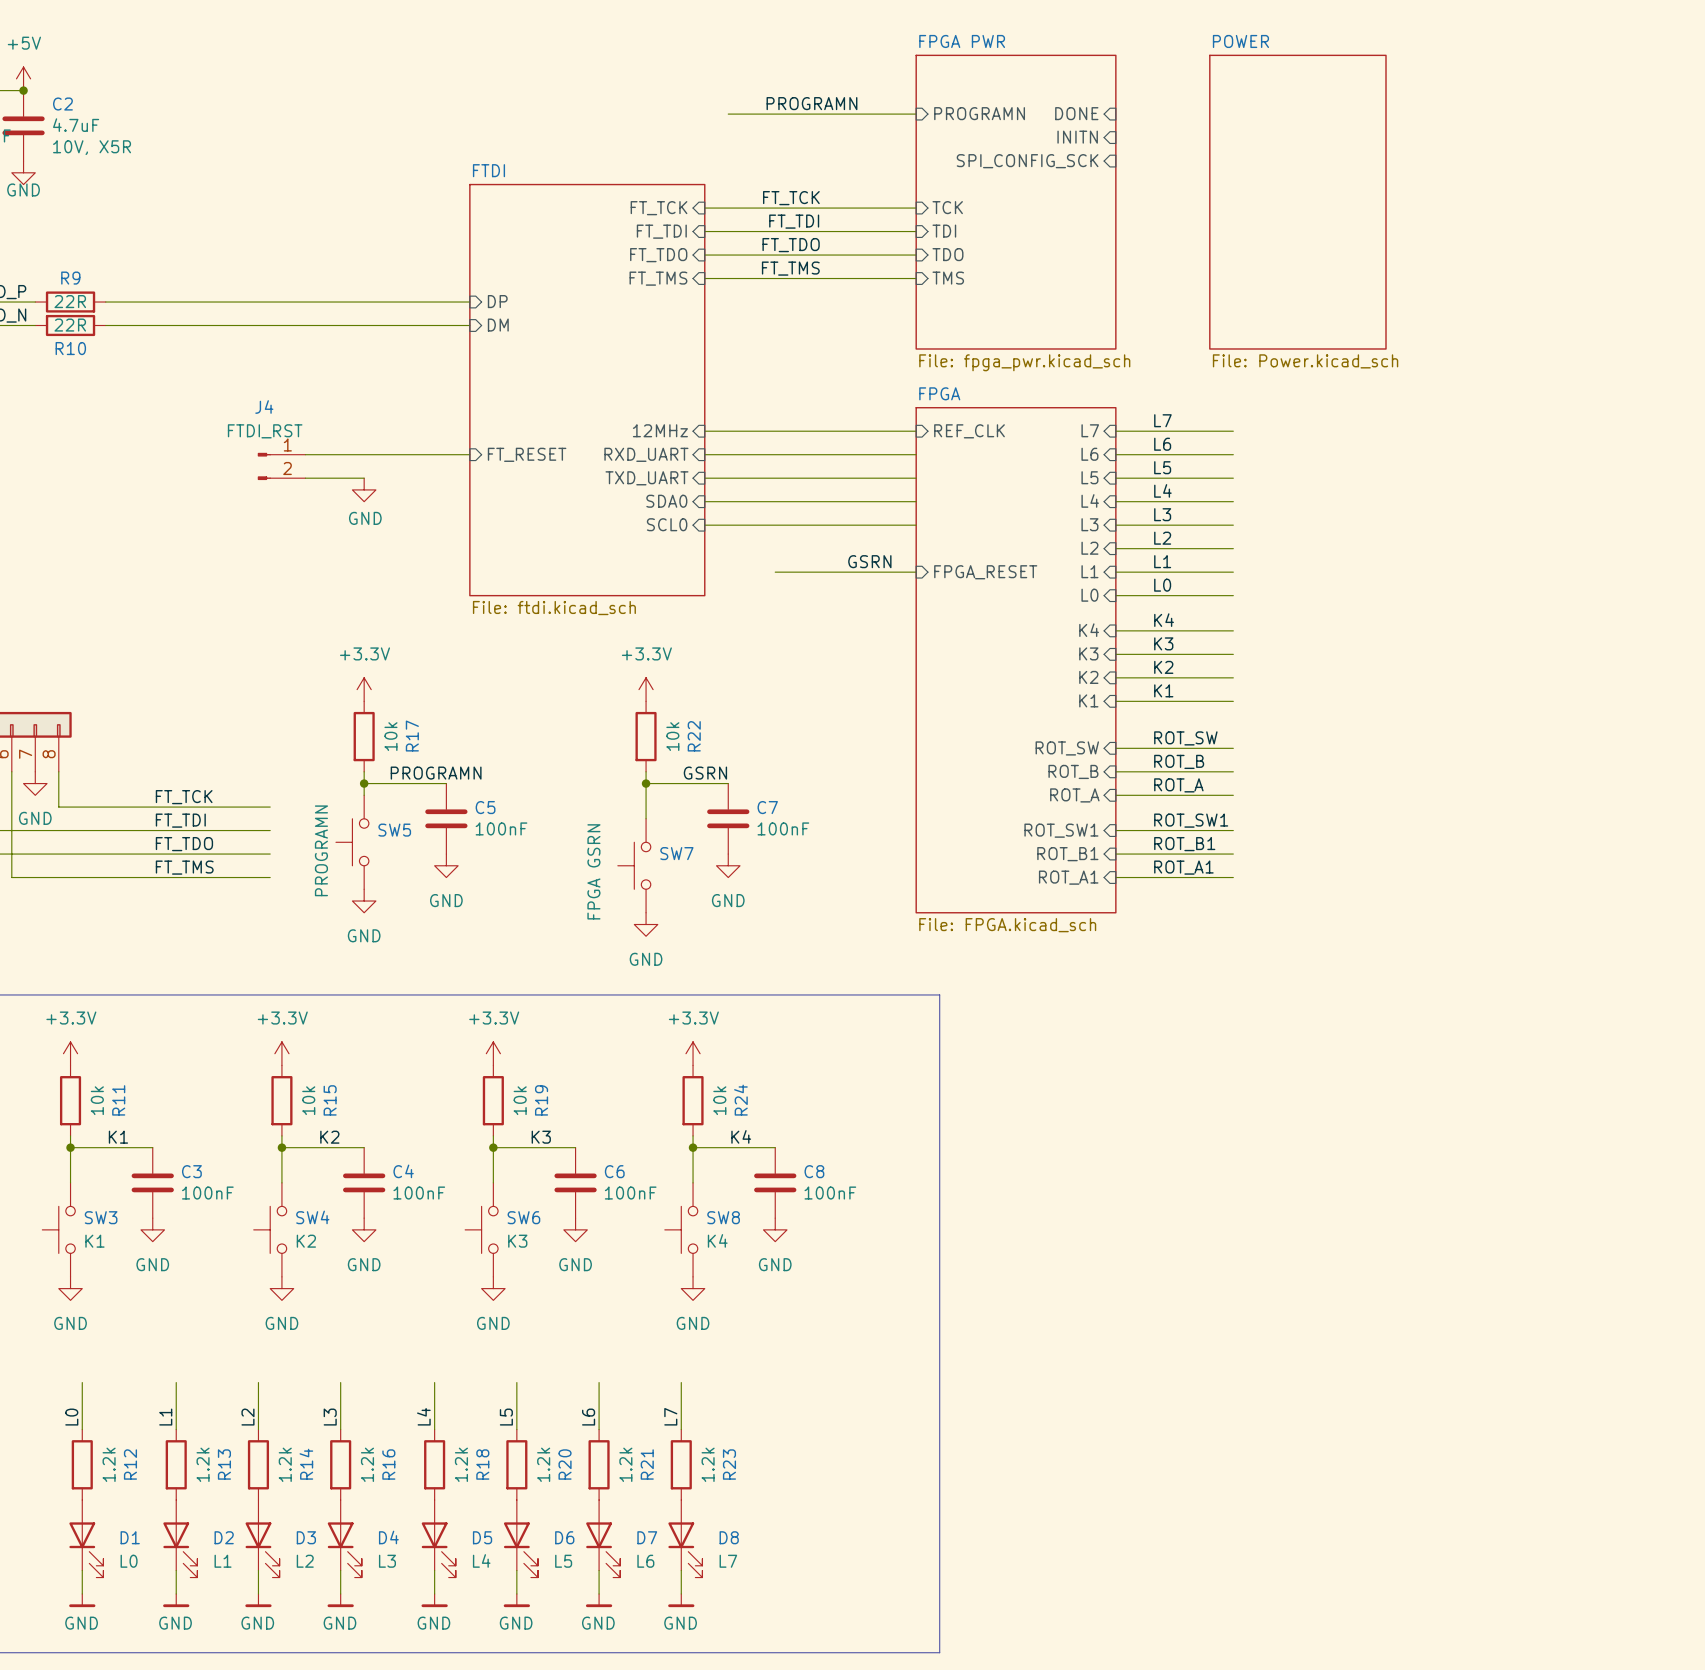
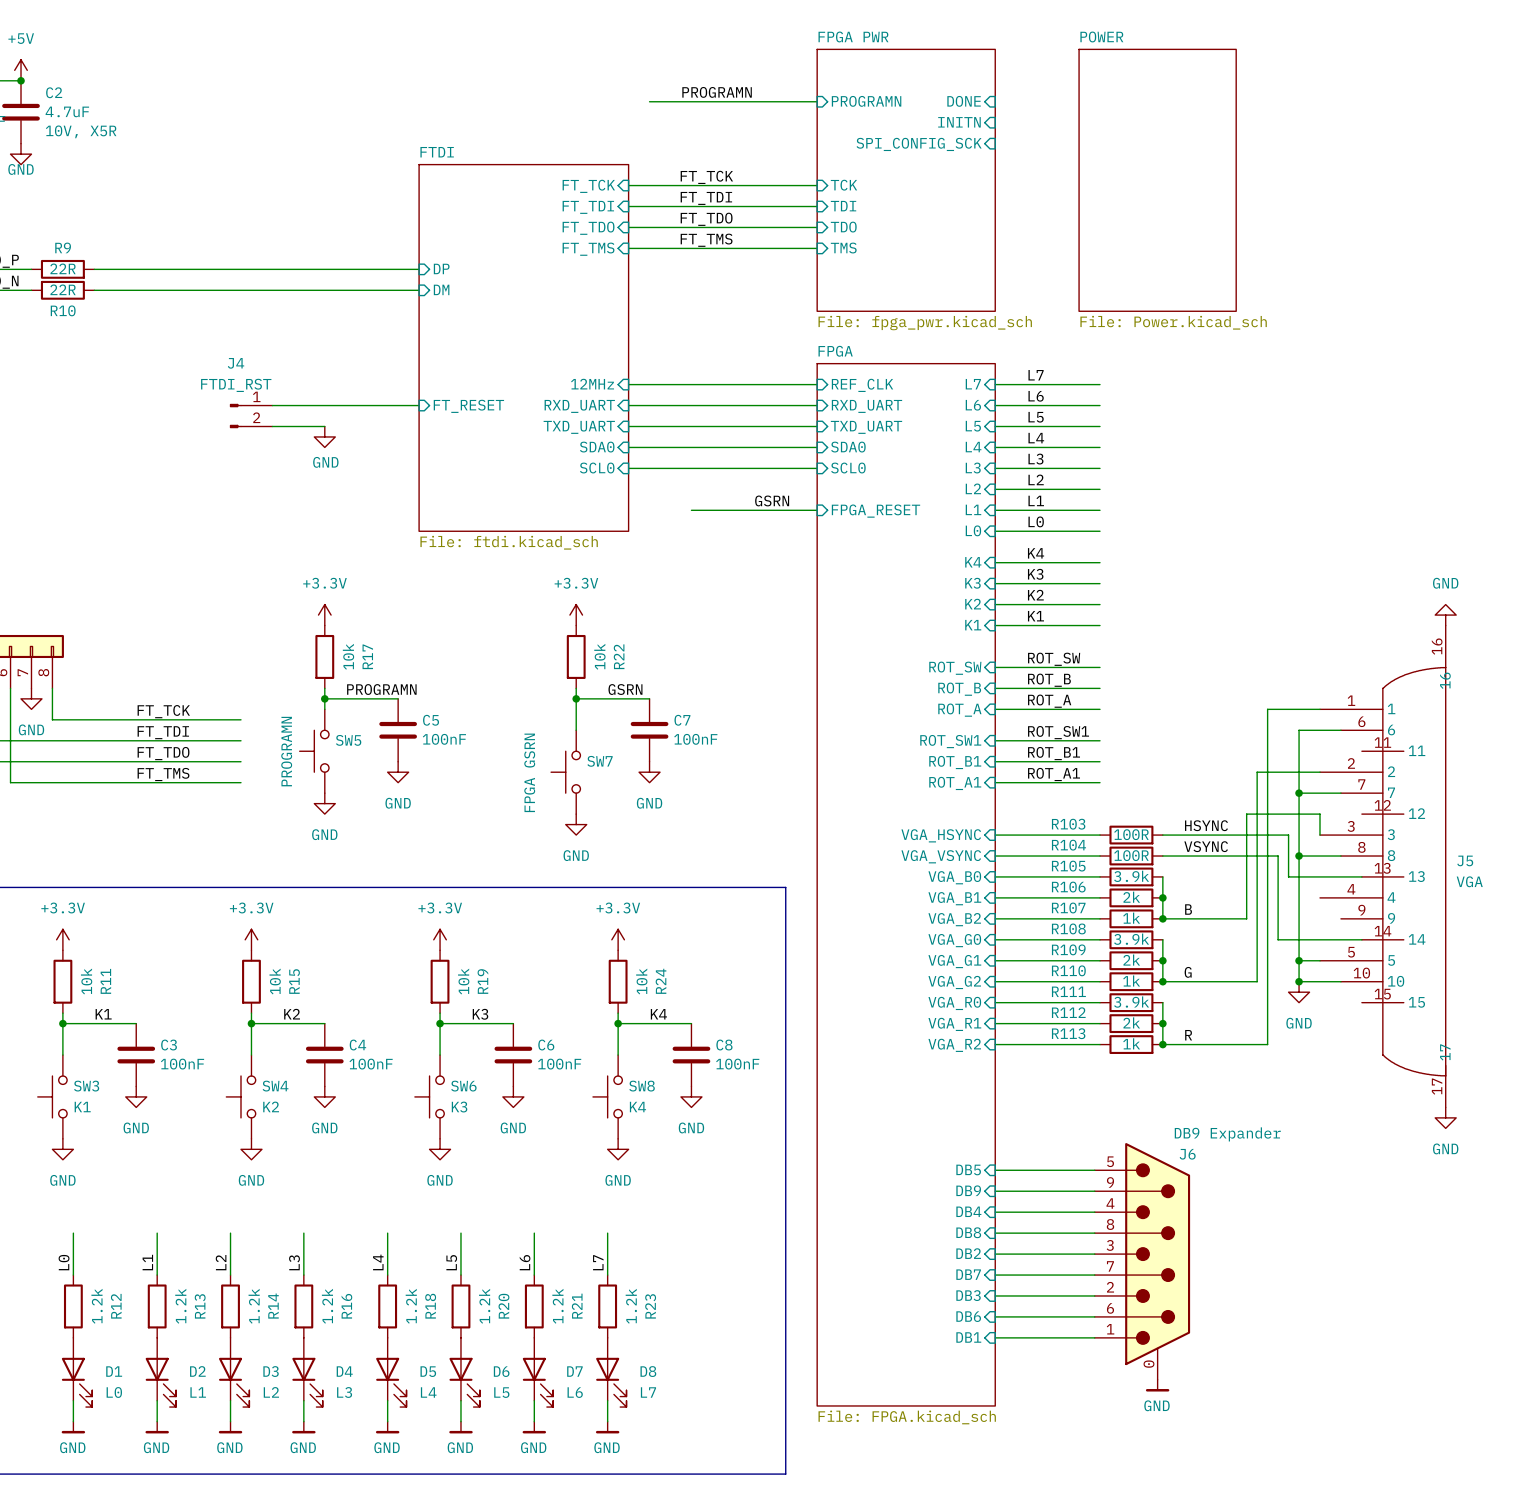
sheet pin: none -> RXD_UART (866, 406)
sheet pin: none -> TXD_UART (866, 427)
sheet pin: none -> SDA0 (848, 447)
sheet pin: none -> SCL0 (848, 468)
sheet FPGA: File: FPGA.kicad_sch (1016, 660) -> none
power symbol: none -> GND (1445, 615)
wire: none -> (1319, 709) (1267, 709) (1267, 1044) (1162, 1044) (1162, 1002)
wire: none -> (1340, 730) (1299, 730) (1299, 981) (1340, 981)
wire: none -> (1319, 772) (1257, 772) (1257, 981) (1162, 981) (1162, 939)
wire: none -> (1299, 793) (1340, 793)
junction: none -> (1299, 793)
label: none -> HSYNC (1206, 825)
sheet pin: none -> VGA_HSYNC (941, 835)
wire: none -> (995, 835) (1100, 835)
R103: none -> 100R (1131, 835)
wire: none -> (1162, 835) (1288, 835) (1288, 876) (1361, 876)
wire: none -> (1319, 835) (1319, 814) (1246, 814) (1246, 918) (1162, 918) (1162, 876)
label: none -> VSYNC (1206, 846)
sheet pin: none -> VGA_VSYNC (941, 856)
wire: none -> (995, 856) (1100, 856)
R104: none -> 100R (1131, 856)
wire: none -> (1162, 856) (1278, 856) (1278, 939) (1361, 939)
wire: none -> (1299, 856) (1340, 856)
junction: none -> (1299, 856)
J5: none -> VGA (1382, 866)
sheet pin: none -> VGA_B0 (954, 877)
wire: none -> (995, 876) (1100, 876)
R105: none -> 3.9k (1131, 876)
sheet FPGA: none -> File: FPGA.kicad_sch (906, 884)
line: (880, 994) (939, 994) (939, 1652) (880, 1652) -> (785, 887) (785, 1474)
sheet pin: none -> VGA_B1 (954, 898)
wire: none -> (995, 897) (1100, 897)
R106: none -> 2k (1131, 897)
junction: none -> (1162, 897)
label: none -> B (1188, 909)
sheet pin: none -> VGA_B2 (954, 919)
wire: none -> (995, 918) (1100, 918)
R107: none -> 1k (1131, 918)
junction: none -> (1162, 918)
sheet pin: none -> VGA_G0 (954, 940)
wire: none -> (995, 939) (1100, 939)
R108: none -> 3.9k (1131, 939)
sheet pin: none -> VGA_G1 (954, 961)
wire: none -> (995, 960) (1100, 960)
R109: none -> 2k (1131, 960)
junction: none -> (1162, 960)
wire: none -> (1299, 960) (1319, 960)
junction: none -> (1299, 960)
label: none -> G (1188, 972)
sheet pin: none -> VGA_G2 (954, 982)
wire: none -> (995, 981) (1100, 981)
R110: none -> 1k (1131, 981)
junction: none -> (1162, 981)
junction: none -> (1299, 981)
power symbol: none -> GND (1299, 992)
sheet pin: none -> VGA_R0 (954, 1003)
wire: none -> (995, 1002) (1100, 1002)
R111: none -> 3.9k (1131, 1002)
sheet pin: none -> VGA_R1 (954, 1024)
wire: none -> (995, 1023) (1100, 1023)
R112: none -> 2k (1131, 1023)
junction: none -> (1162, 1023)
label: none -> R (1188, 1035)
sheet pin: none -> VGA_R2 (954, 1045)
wire: none -> (995, 1044) (1100, 1044)
R113: none -> 1k (1131, 1044)
junction: none -> (1162, 1044)
power symbol: none -> GND (1445, 1117)
sheet pin: none -> DB5 (968, 1169)
wire: none -> (995, 1170) (1094, 1170)
sheet pin: none -> DB9 (968, 1190)
wire: none -> (995, 1191) (1094, 1191)
sheet pin: none -> DB4 (968, 1211)
wire: none -> (995, 1212) (1094, 1212)
sheet pin: none -> DB8 (968, 1232)
wire: none -> (995, 1233) (1094, 1233)
sheet pin: none -> DB2 (968, 1253)
wire: none -> (995, 1254) (1094, 1254)
J6: none -> DB9 Expander (1142, 1261)
sheet pin: none -> DB7 (968, 1274)
wire: none -> (995, 1275) (1094, 1275)
sheet pin: none -> DB3 (968, 1295)
wire: none -> (995, 1295) (1094, 1295)
sheet pin: none -> DB6 (968, 1316)
wire: none -> (995, 1316) (1094, 1316)
sheet pin: none -> DB1 (968, 1337)
wire: none -> (995, 1337) (1094, 1337)
power symbol: none -> GND (1157, 1385)

